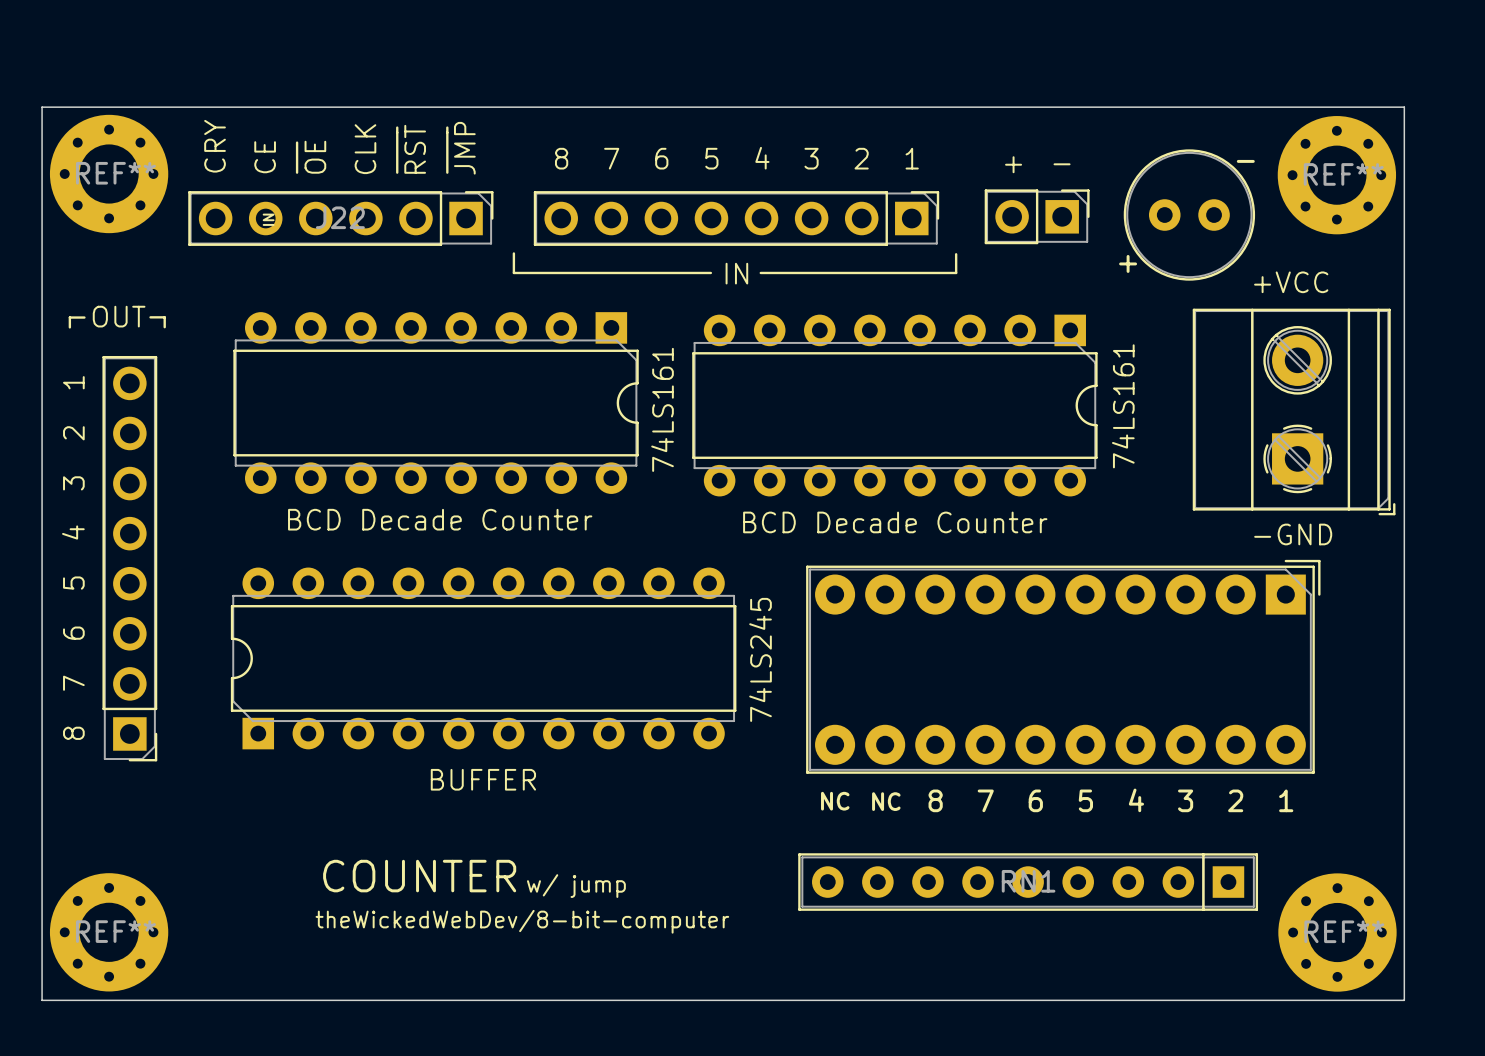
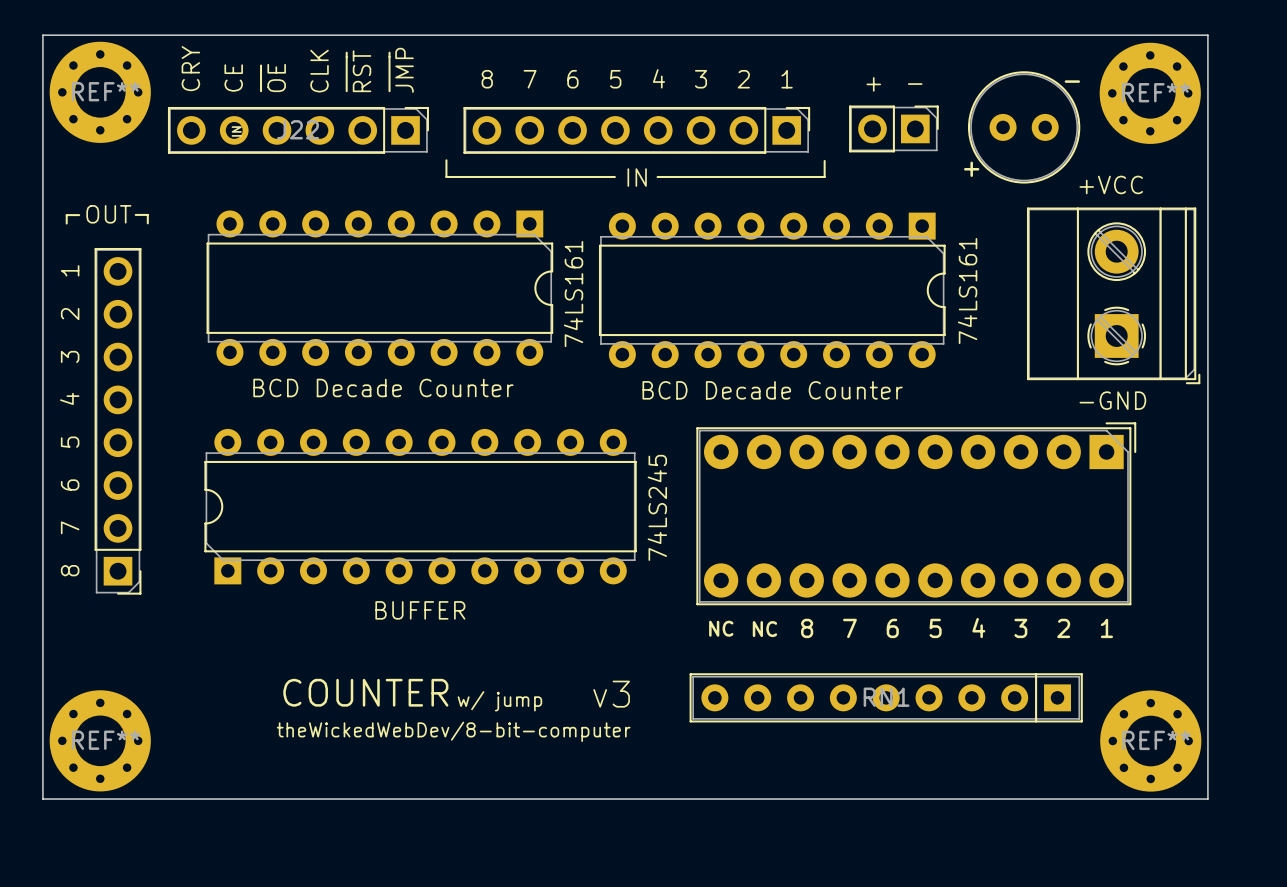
text: none -> v3 (611, 694)

